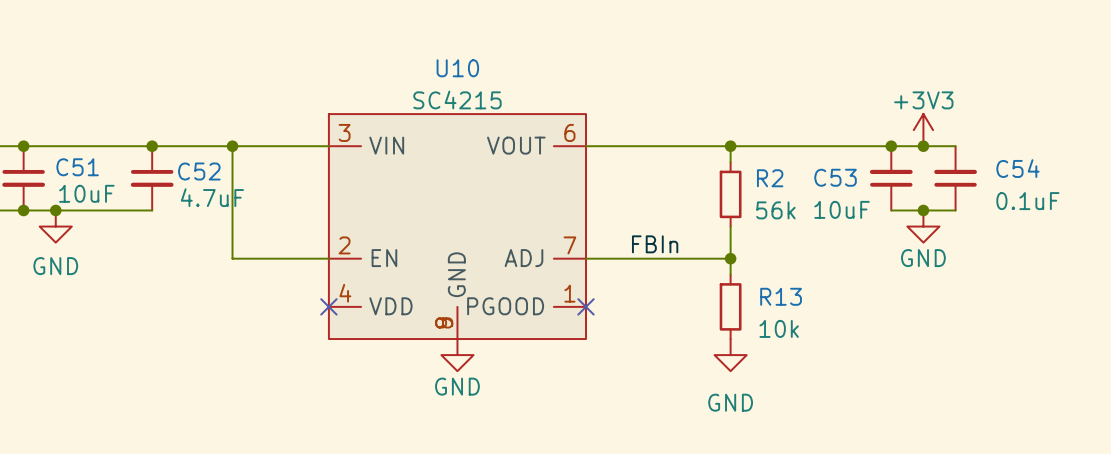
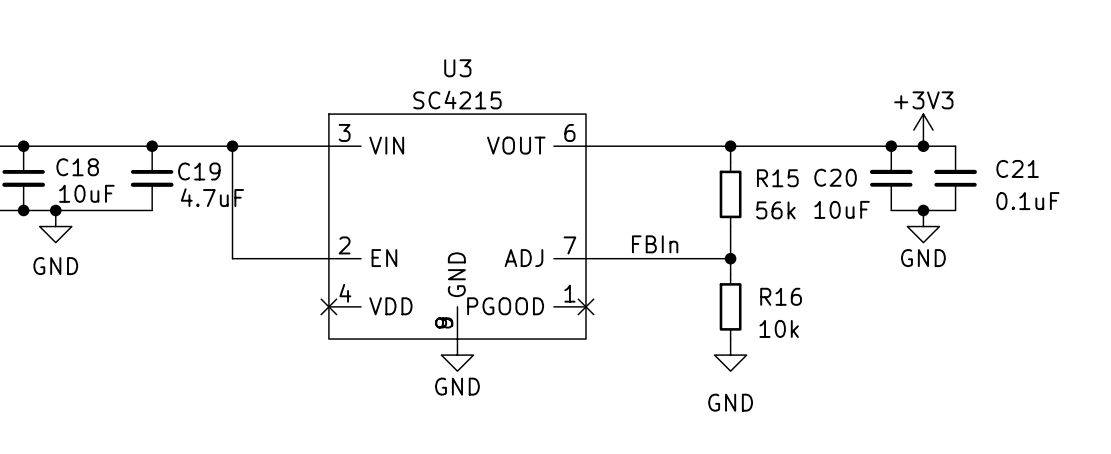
U10 name: U10 (457, 68) -> U3 (457, 68)
C51 name: C51 (77, 167) -> C18 (77, 167)
C54 name: C54 (1017, 168) -> C21 (1017, 168)
C52 name: C52 (199, 171) -> C19 (199, 171)
C53 name: C53 (835, 177) -> C20 (835, 177)
R2 name: R2 (770, 178) -> R15 (777, 178)
R13 name: R13 (781, 296) -> R16 (781, 296)

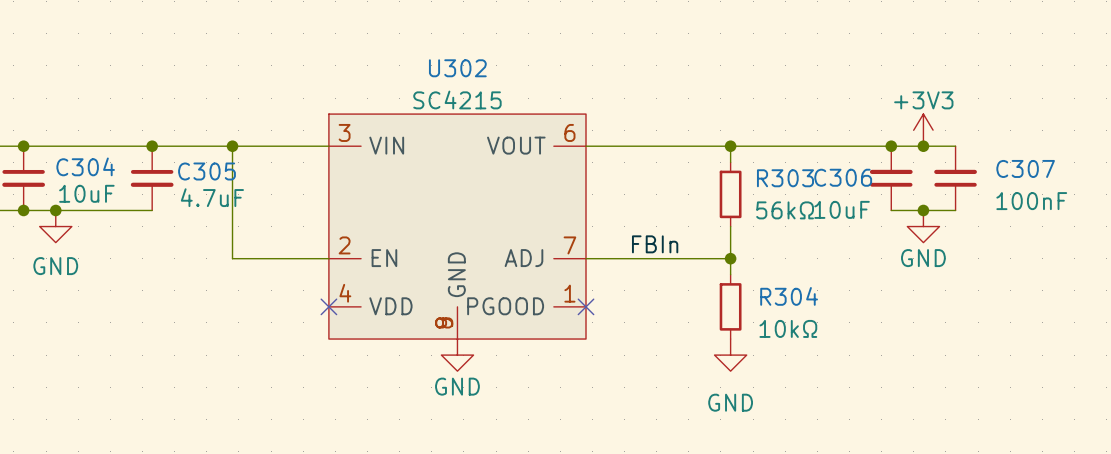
U3 name: U3 (457, 68) -> U302 (457, 68)
C18 name: C18 (77, 167) -> C304 (85, 166)
C21 name: C21 (1017, 168) -> C307 (1025, 168)
C19 name: C19 (199, 171) -> C305 (206, 171)
C20 name: C20 (835, 177) -> C306 (843, 177)
R15 name: R15 (777, 178) -> R303 (785, 178)
C21 value: 0.1uF (1027, 201) -> 100nF (1031, 201)
R15 value: 56k (775, 210) -> 56kΩ (785, 210)
R16 name: R16 (781, 296) -> R304 (789, 296)
R16 value: 10k (779, 328) -> 10kΩ (788, 328)

